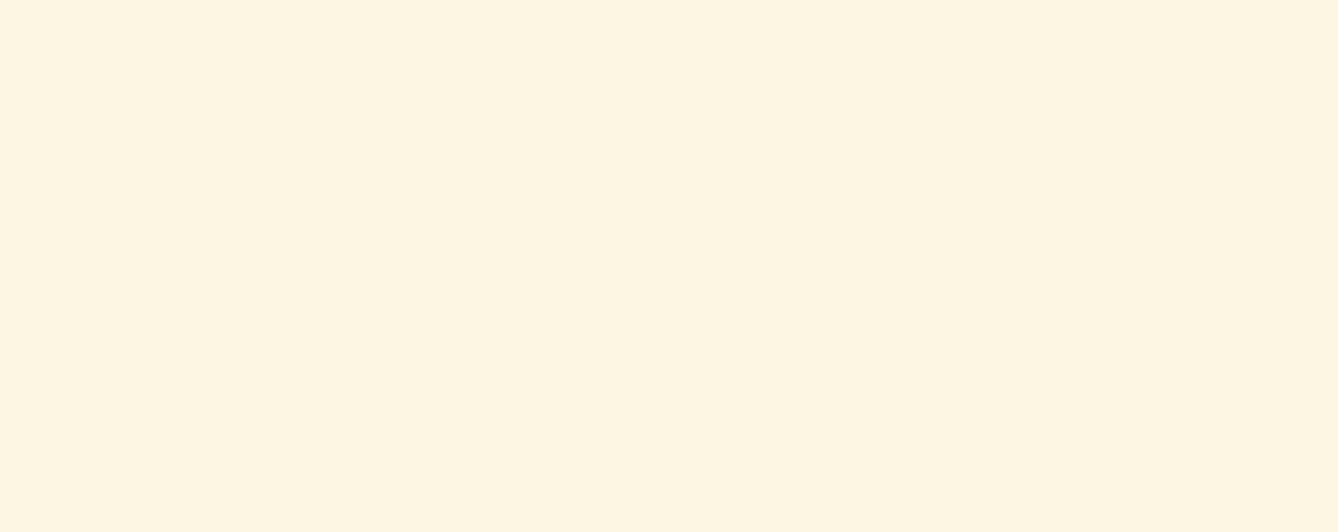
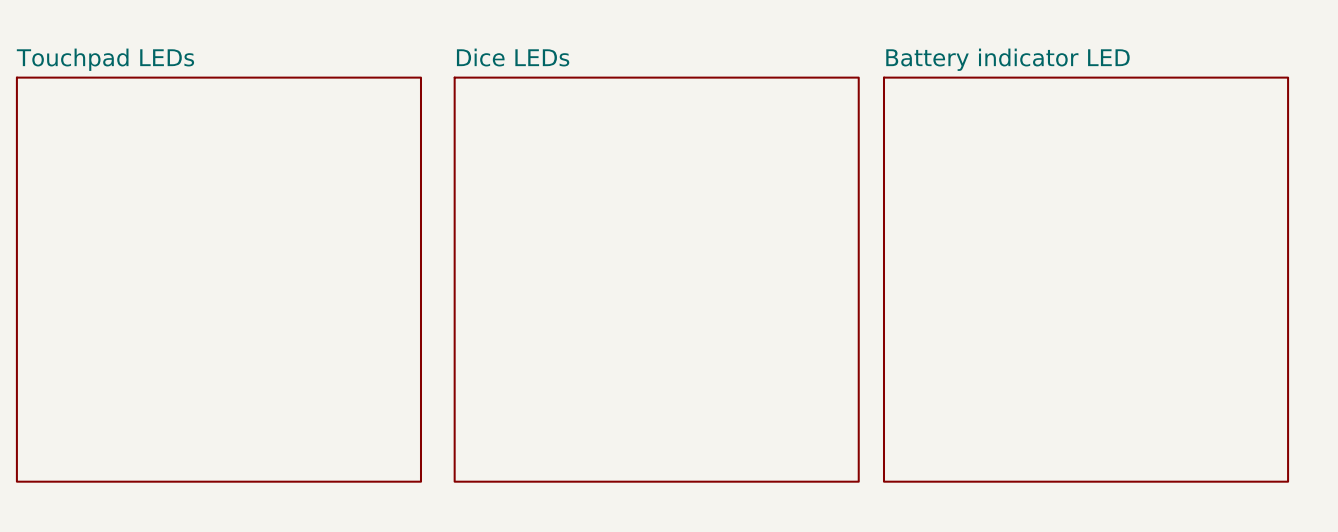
sheet Touchpad LEDs: none -> (218, 279)
sheet Dice LEDs: none -> (656, 279)
sheet Battery indicator LED: none -> (1086, 279)

